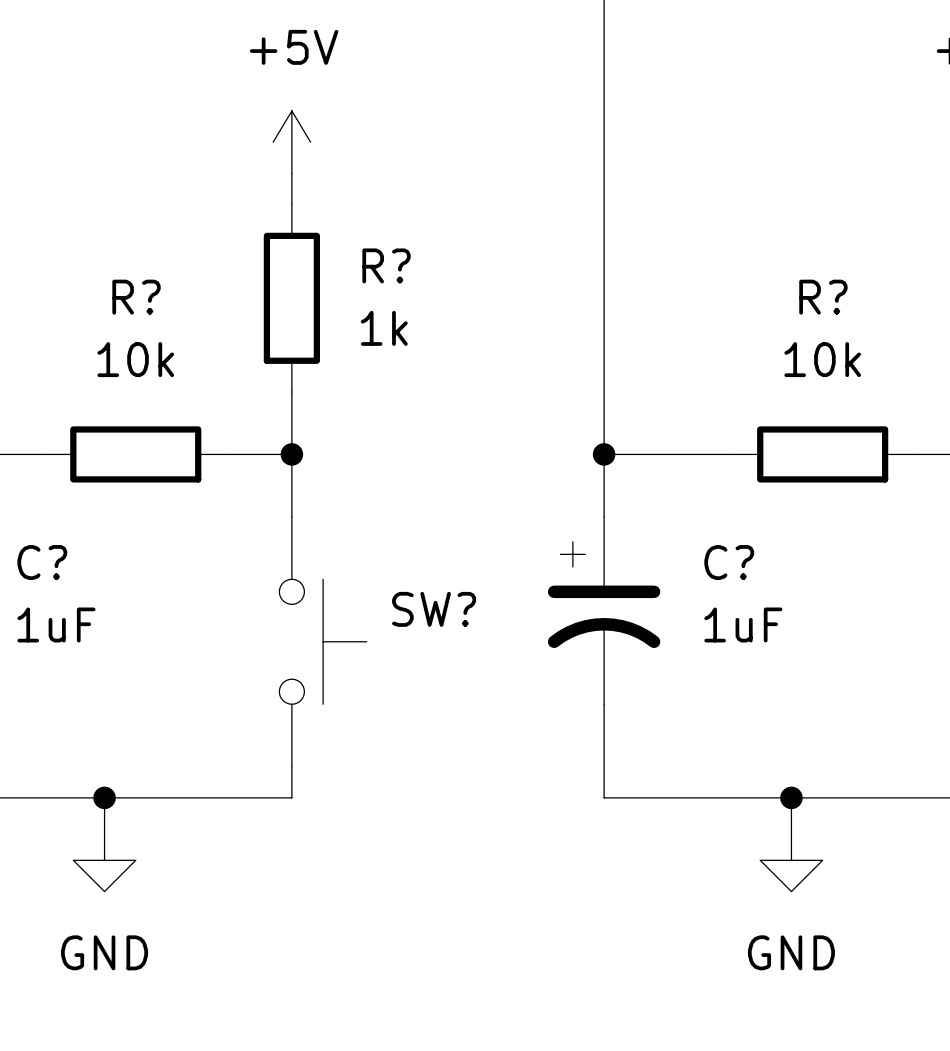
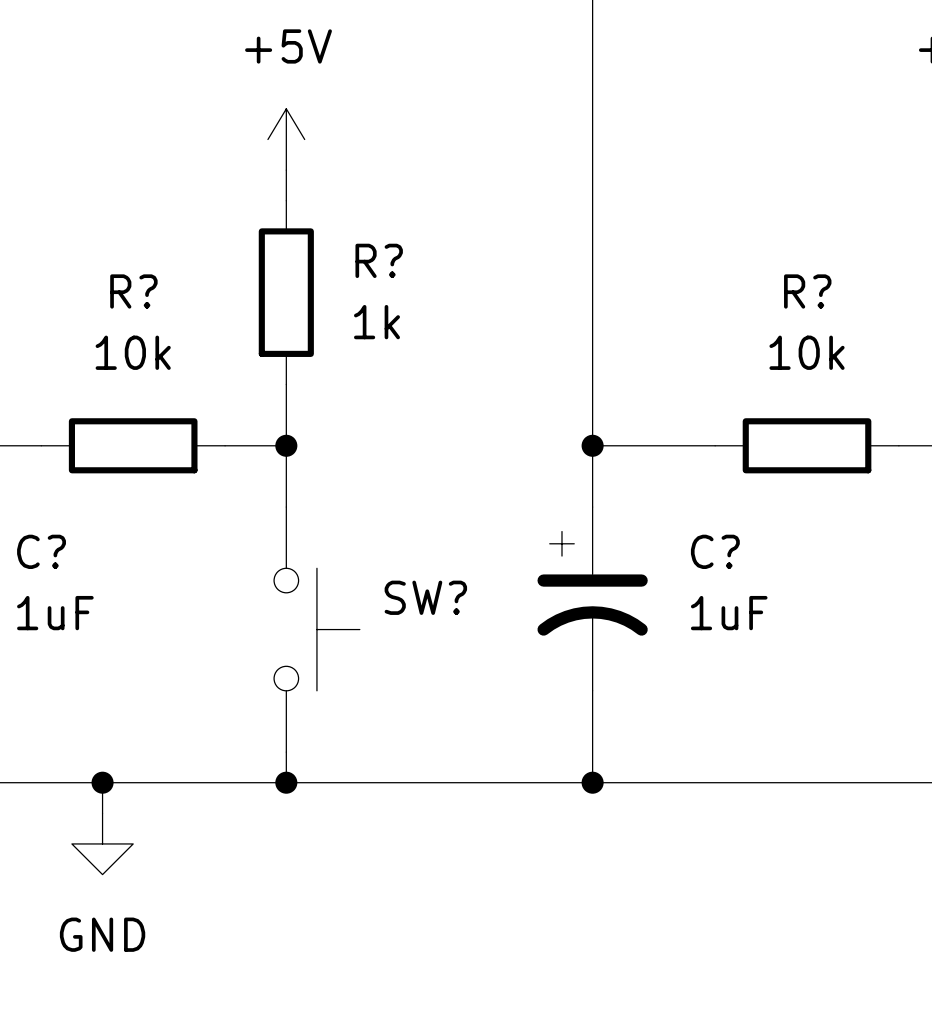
wire: none -> (286, 782) (592, 782)
junction: none -> (286, 782)
junction: none -> (592, 782)
wire: (791, 797) (791, 829) -> none
junction: (791, 797) -> none
power symbol: GND (791, 860) -> none

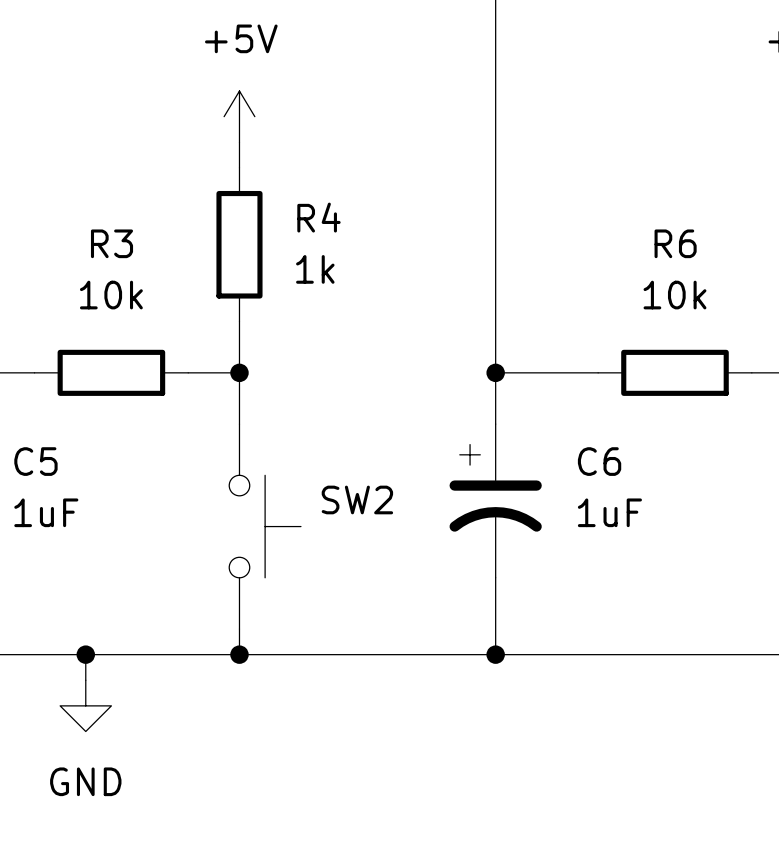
R? name: R? (379, 260) -> R4 (318, 217)
R? name: R? (133, 291) -> R3 (112, 243)
R? name: R? (807, 291) -> R6 (675, 243)
C? name: C? (41, 551) -> C5 (35, 461)
C? name: C? (715, 551) -> C6 (599, 461)
SW? name: SW? (425, 597) -> SW2 (357, 499)

